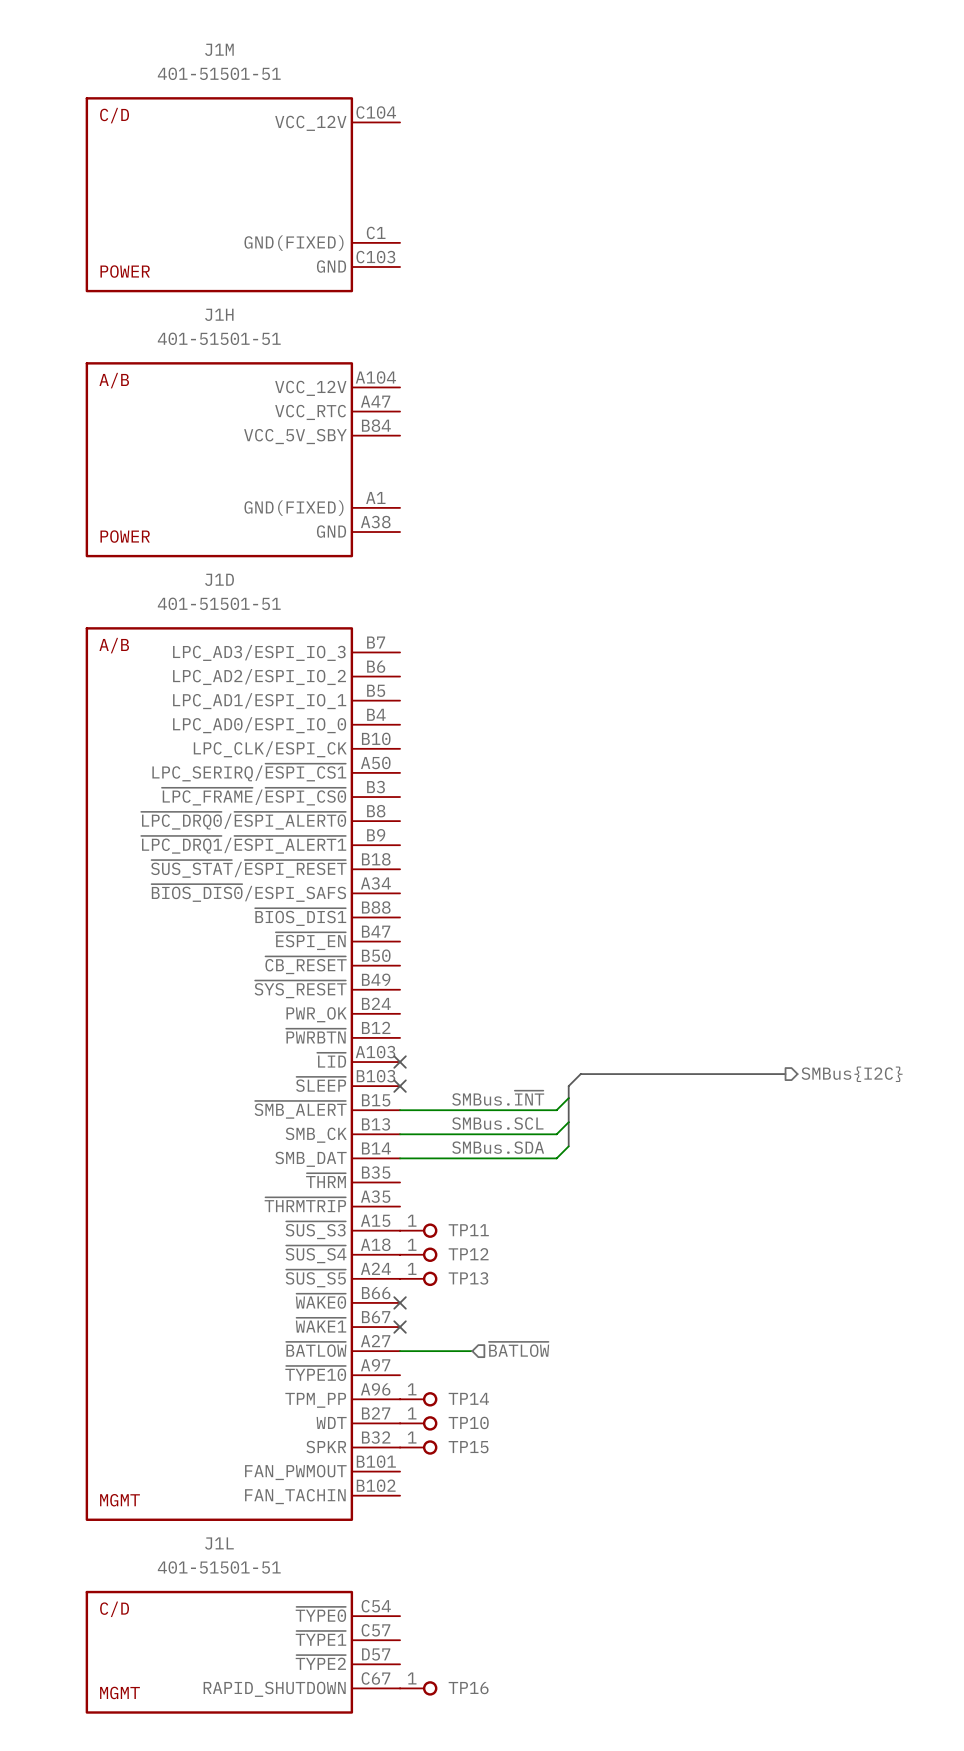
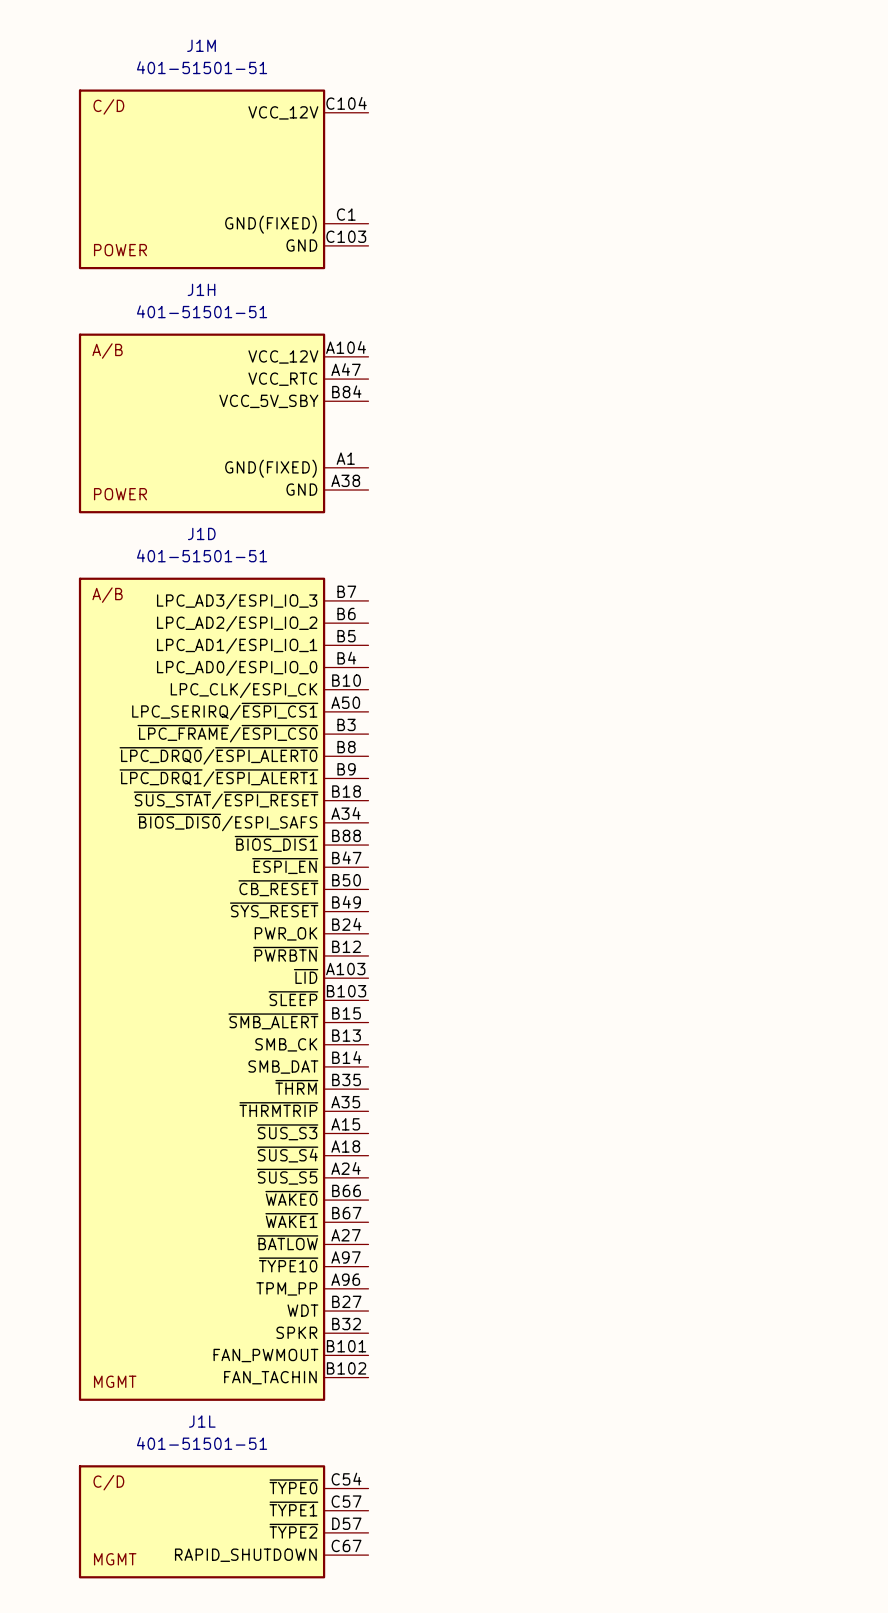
no-connect mark: (400, 1062) -> none
bus: (785, 1074) (580, 1074) (568, 1086) (568, 1146) -> none
hierarchical label: SMBus{I2C} (852, 1074) -> none
no-connect mark: (400, 1086) -> none
label: SMBus.~{INT} (498, 1098) -> none
wire: (568, 1098) (556, 1110) (400, 1110) -> none
wire: (568, 1122) (556, 1134) (400, 1134) -> none
label: SMBus.SCL (497, 1123) -> none
wire: (568, 1146) (556, 1158) (400, 1158) -> none
label: SMBus.SDA (498, 1147) -> none
TP11: (418, 1230) -> none
TP12: (418, 1254) -> none
TP13: (418, 1278) -> none
no-connect mark: (400, 1302) -> none
no-connect mark: (400, 1327) -> none
hierarchical label: ~{BATLOW} (518, 1349) -> none
wire: (400, 1351) (472, 1351) -> none
TP14: (418, 1399) -> none
TP10: (418, 1423) -> none
TP15: (418, 1447) -> none
TP16: (418, 1688) -> none

